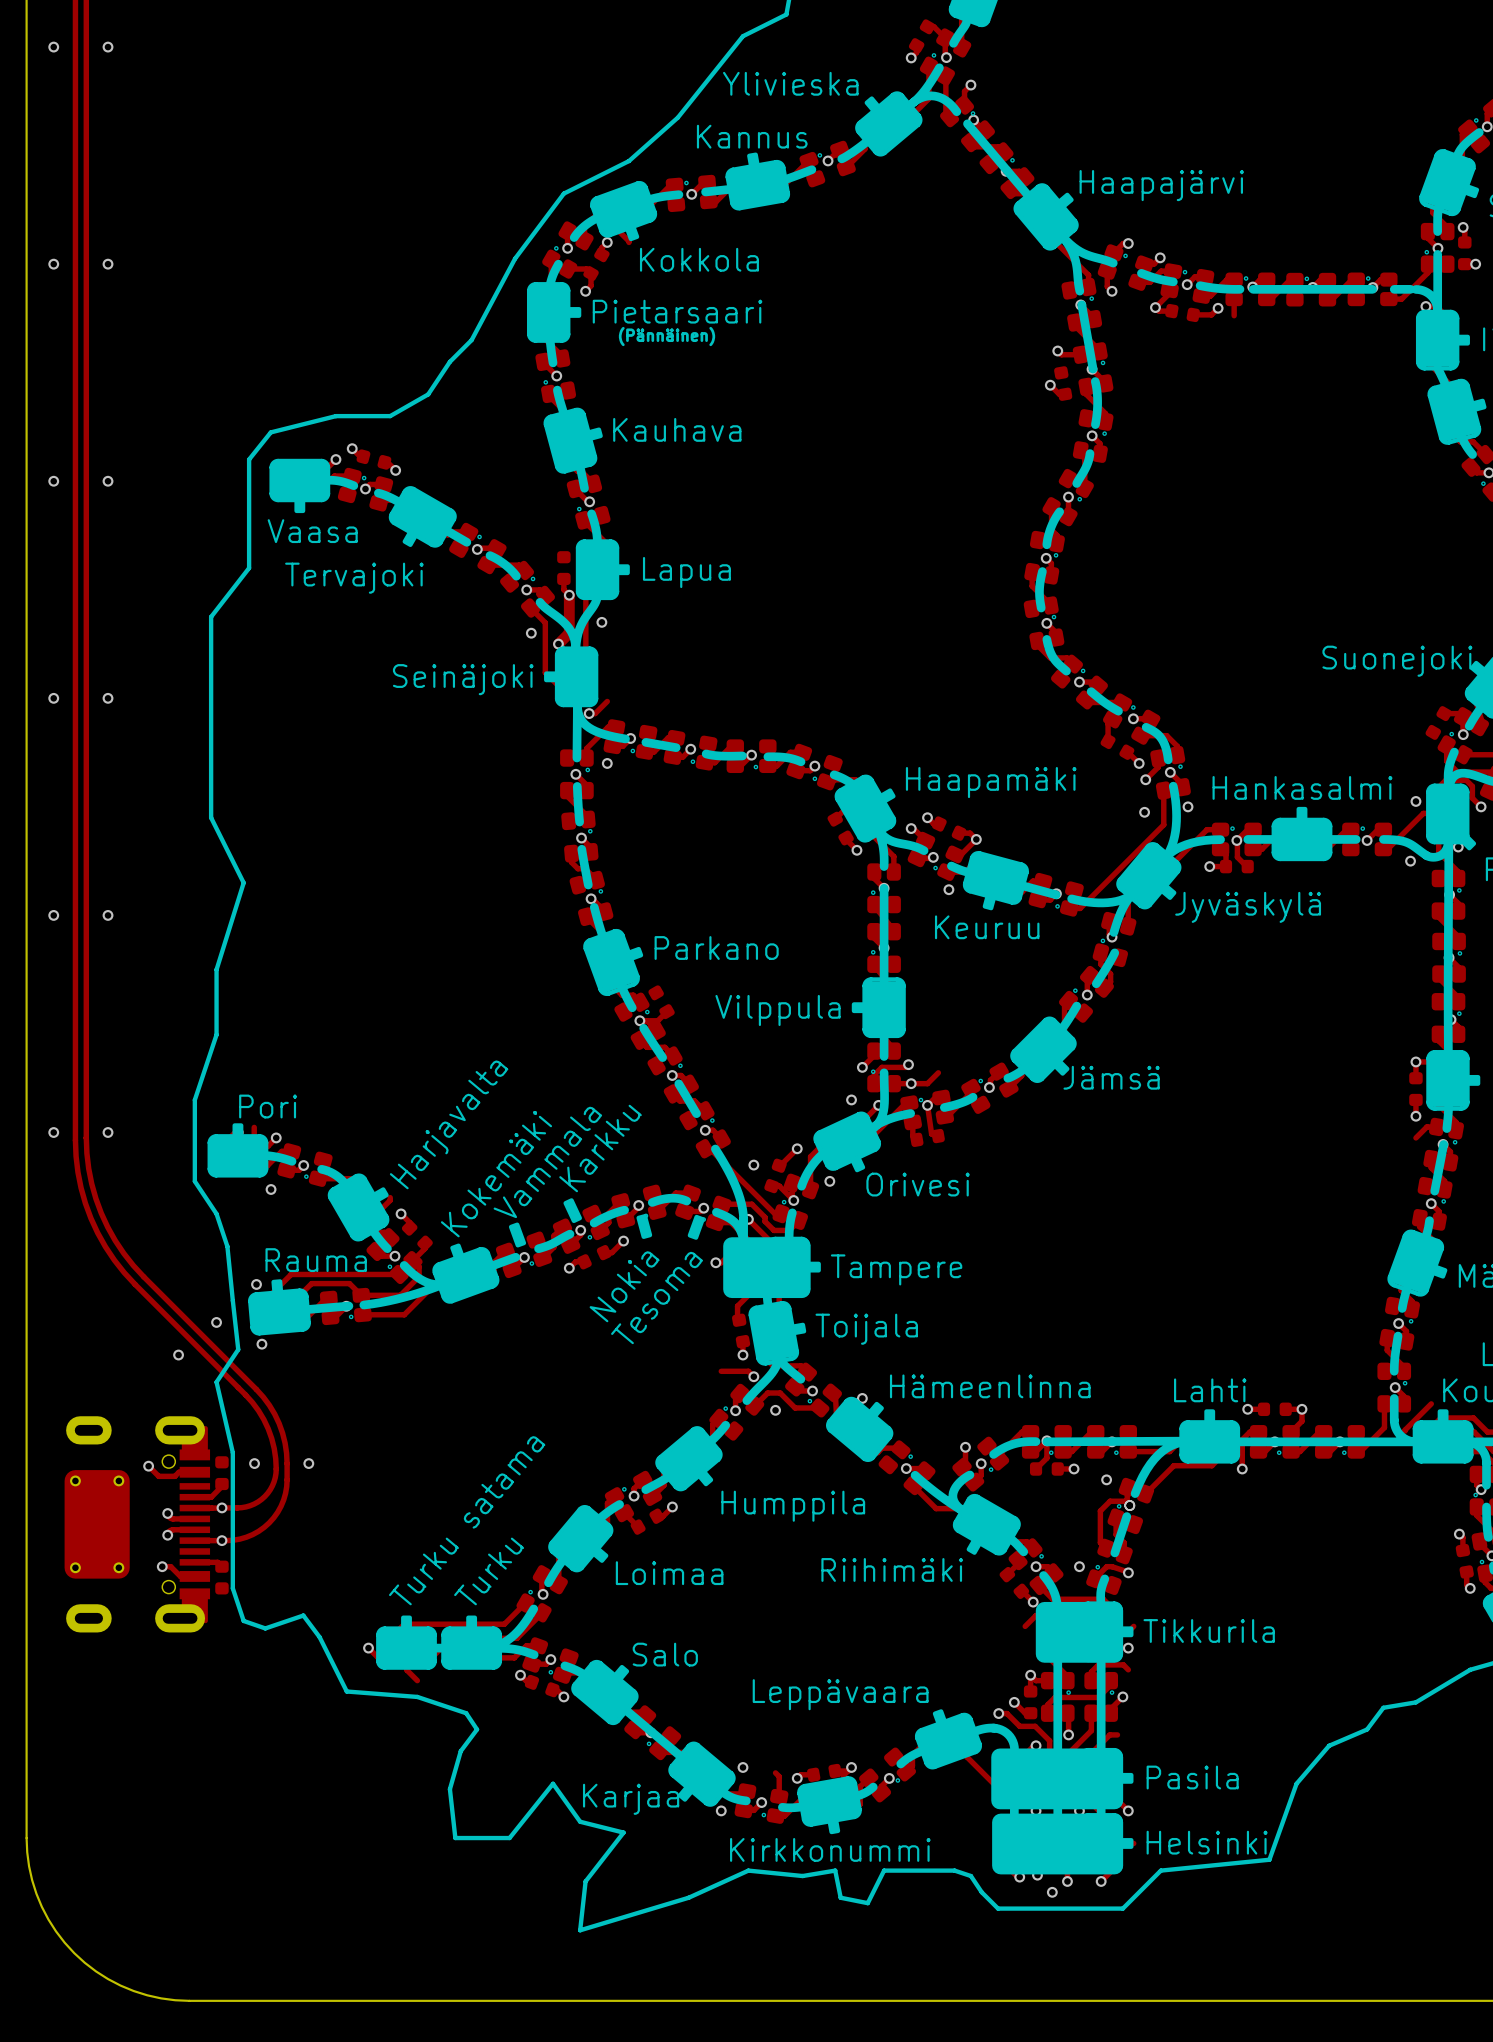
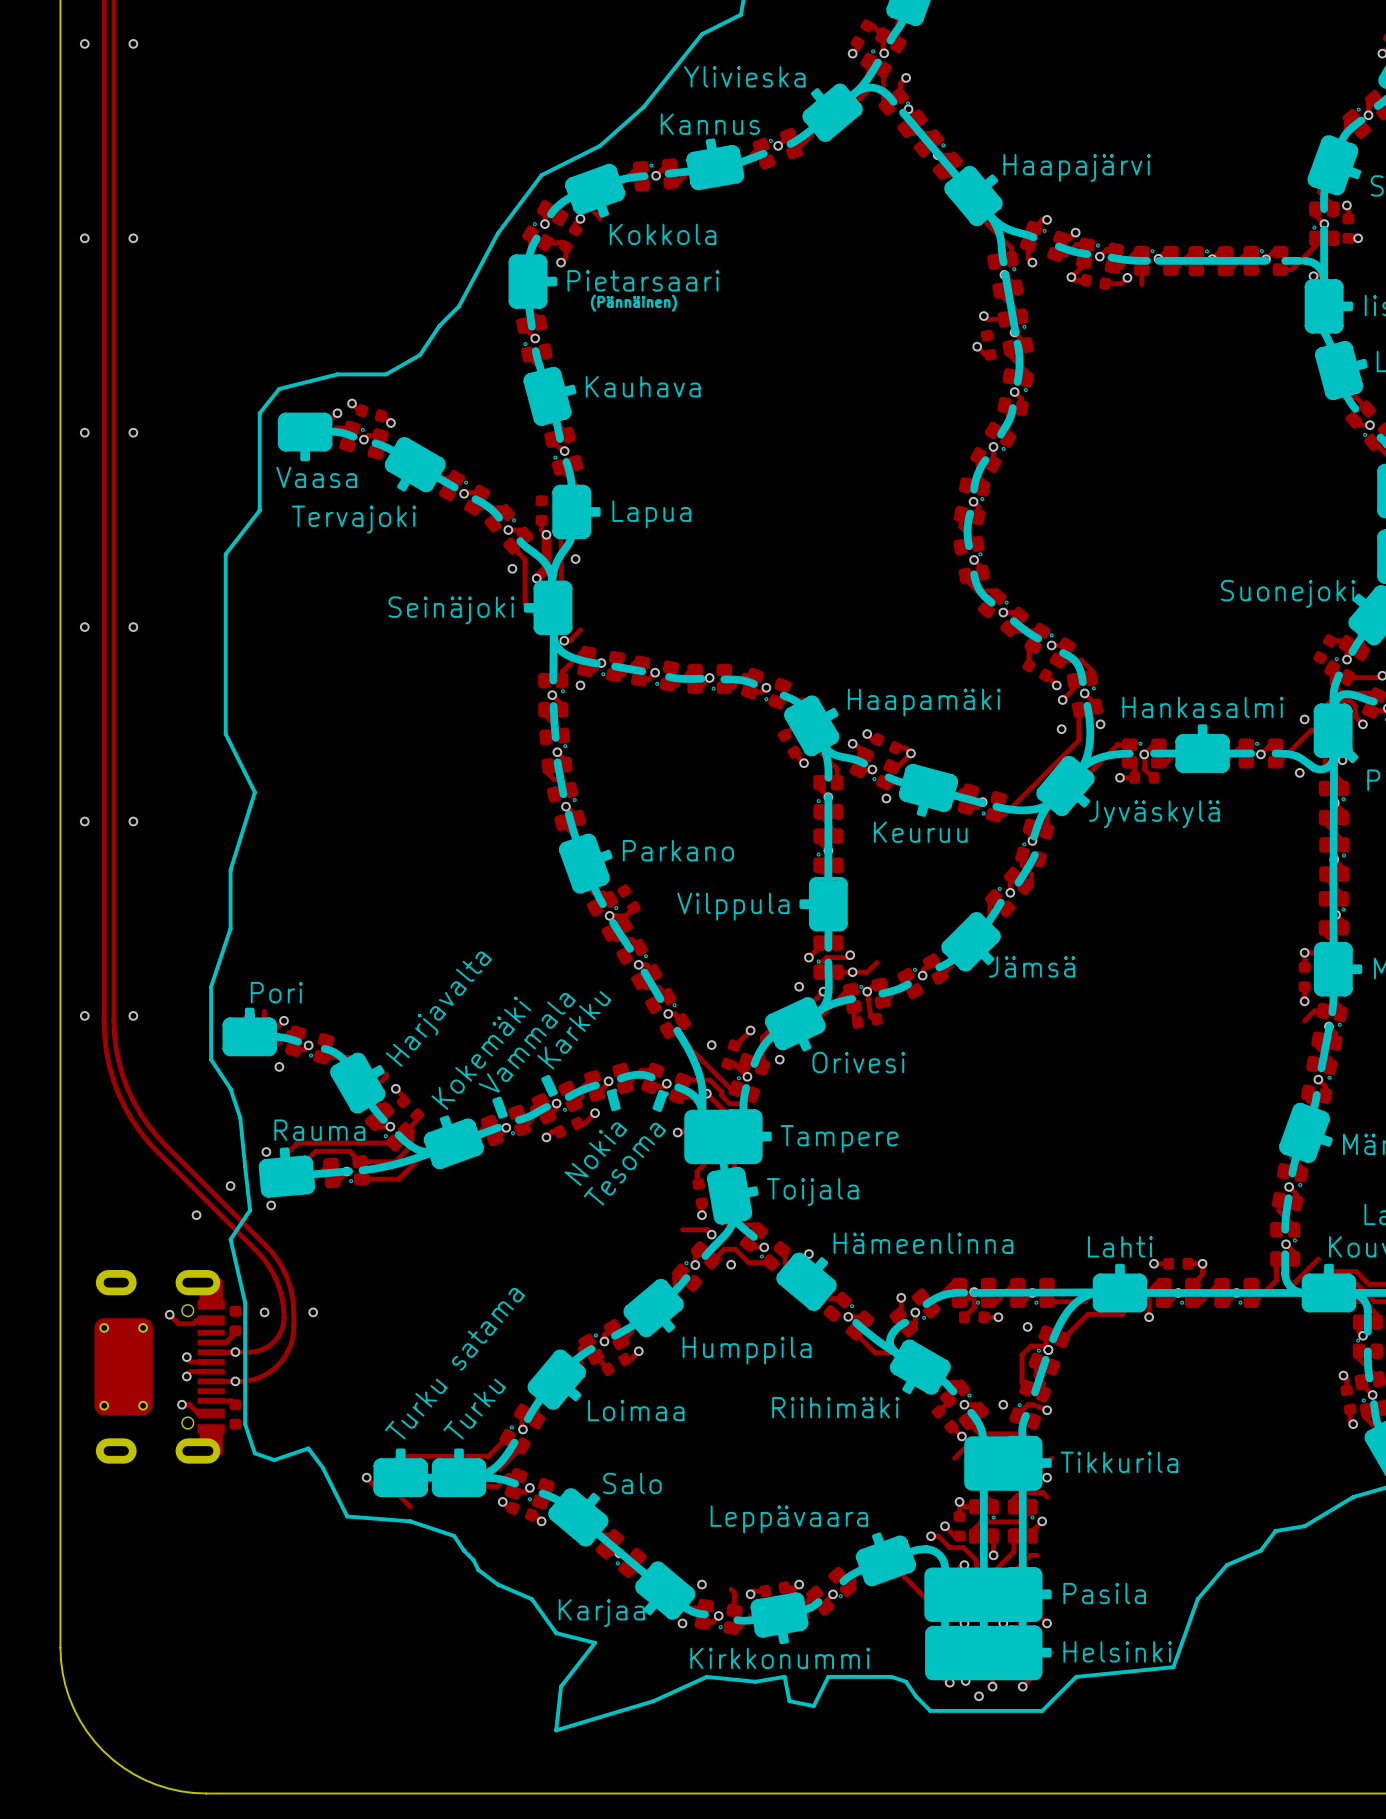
line: (477, 1729) (460, 1751) (449, 1789) (455, 1838) (509, 1838) (553, 1783) -> (463, 1550) (473, 1560) (478, 1569) (497, 1584) (531, 1599)

